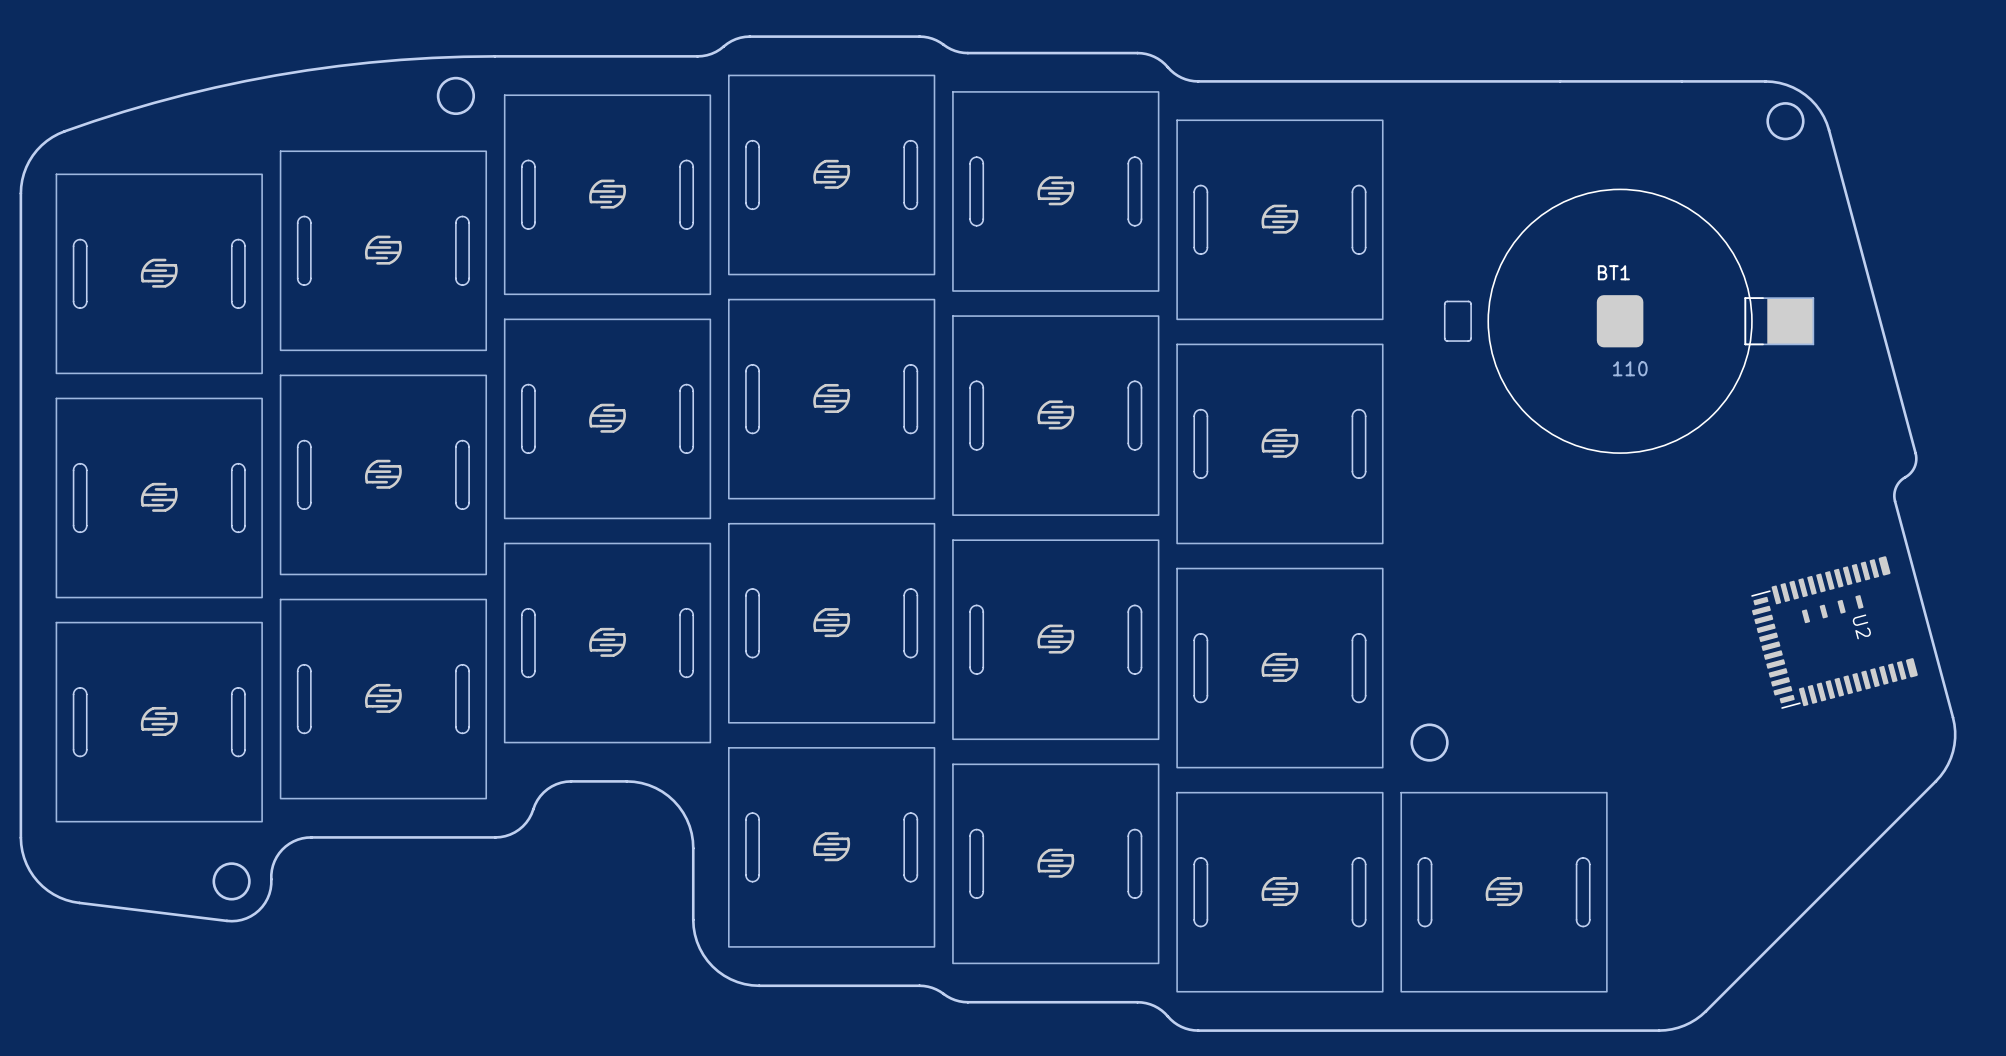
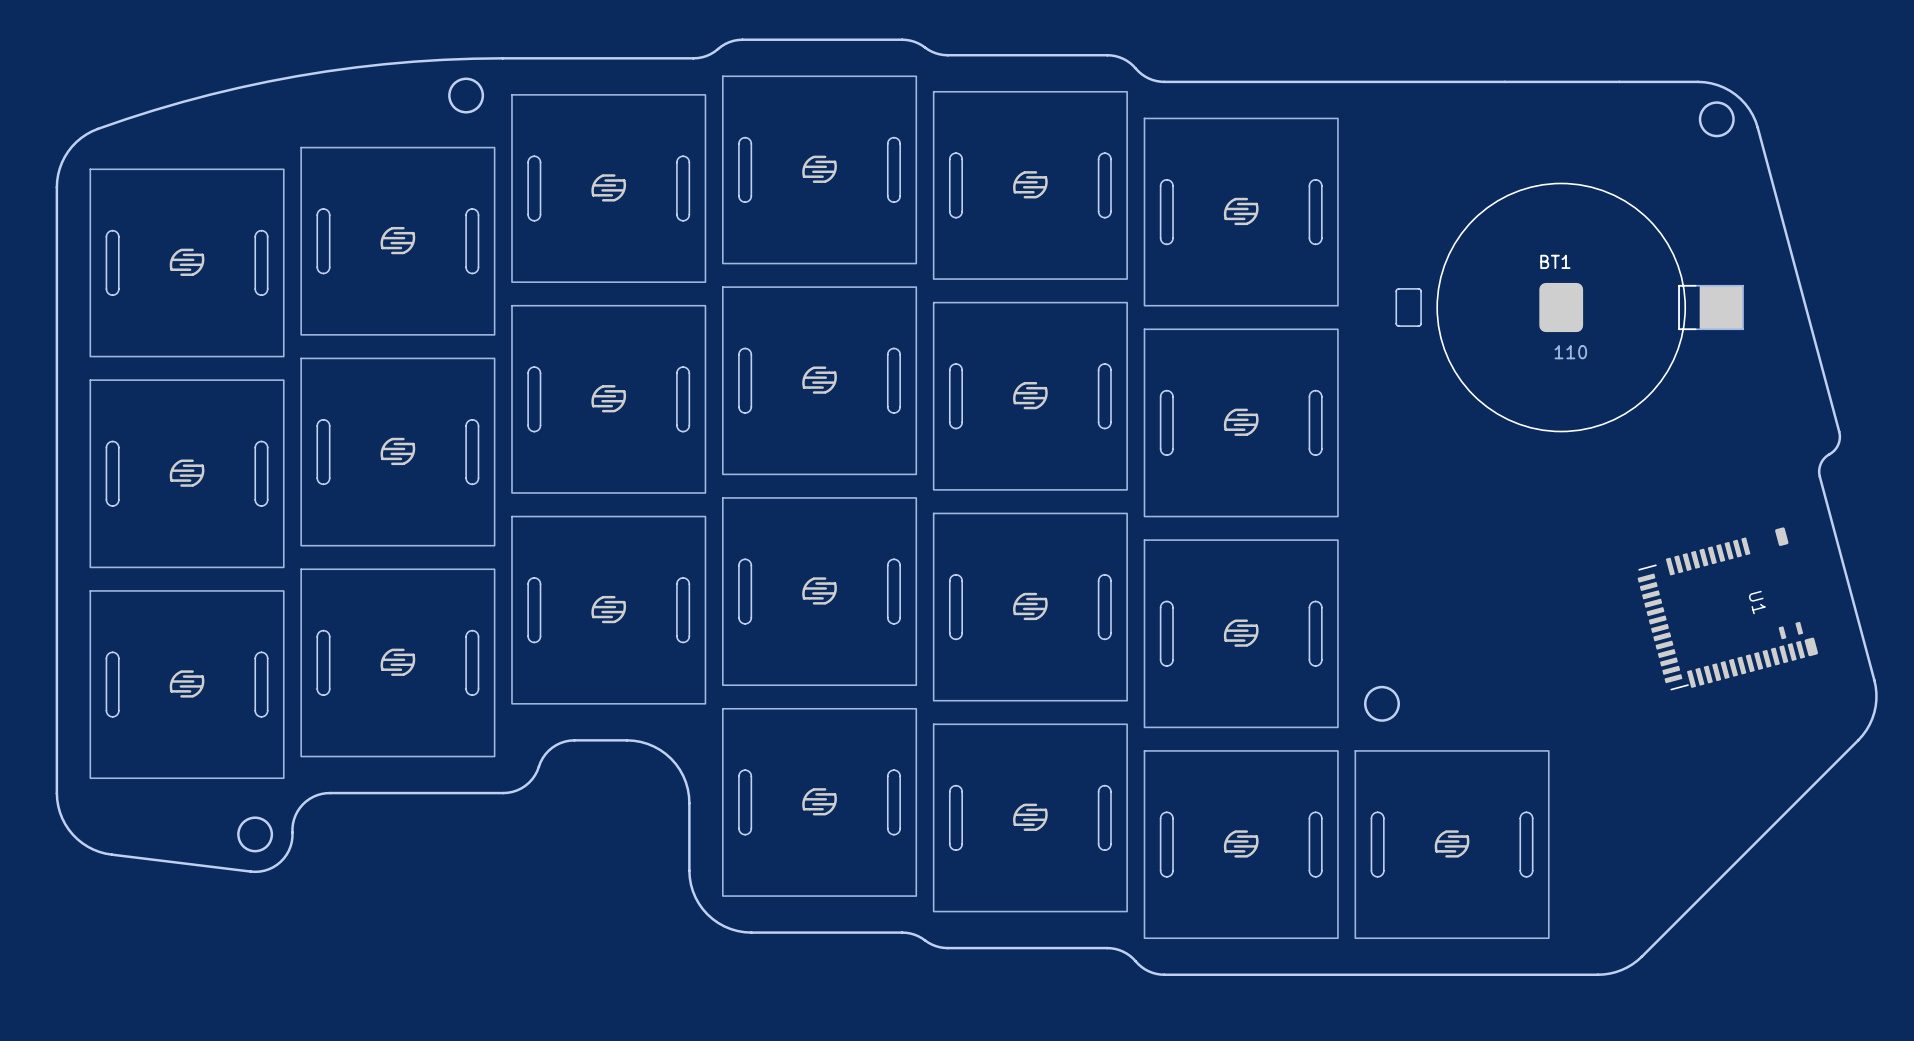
U2: (1834, 632) -> none
U1: none -> (1727, 608)

